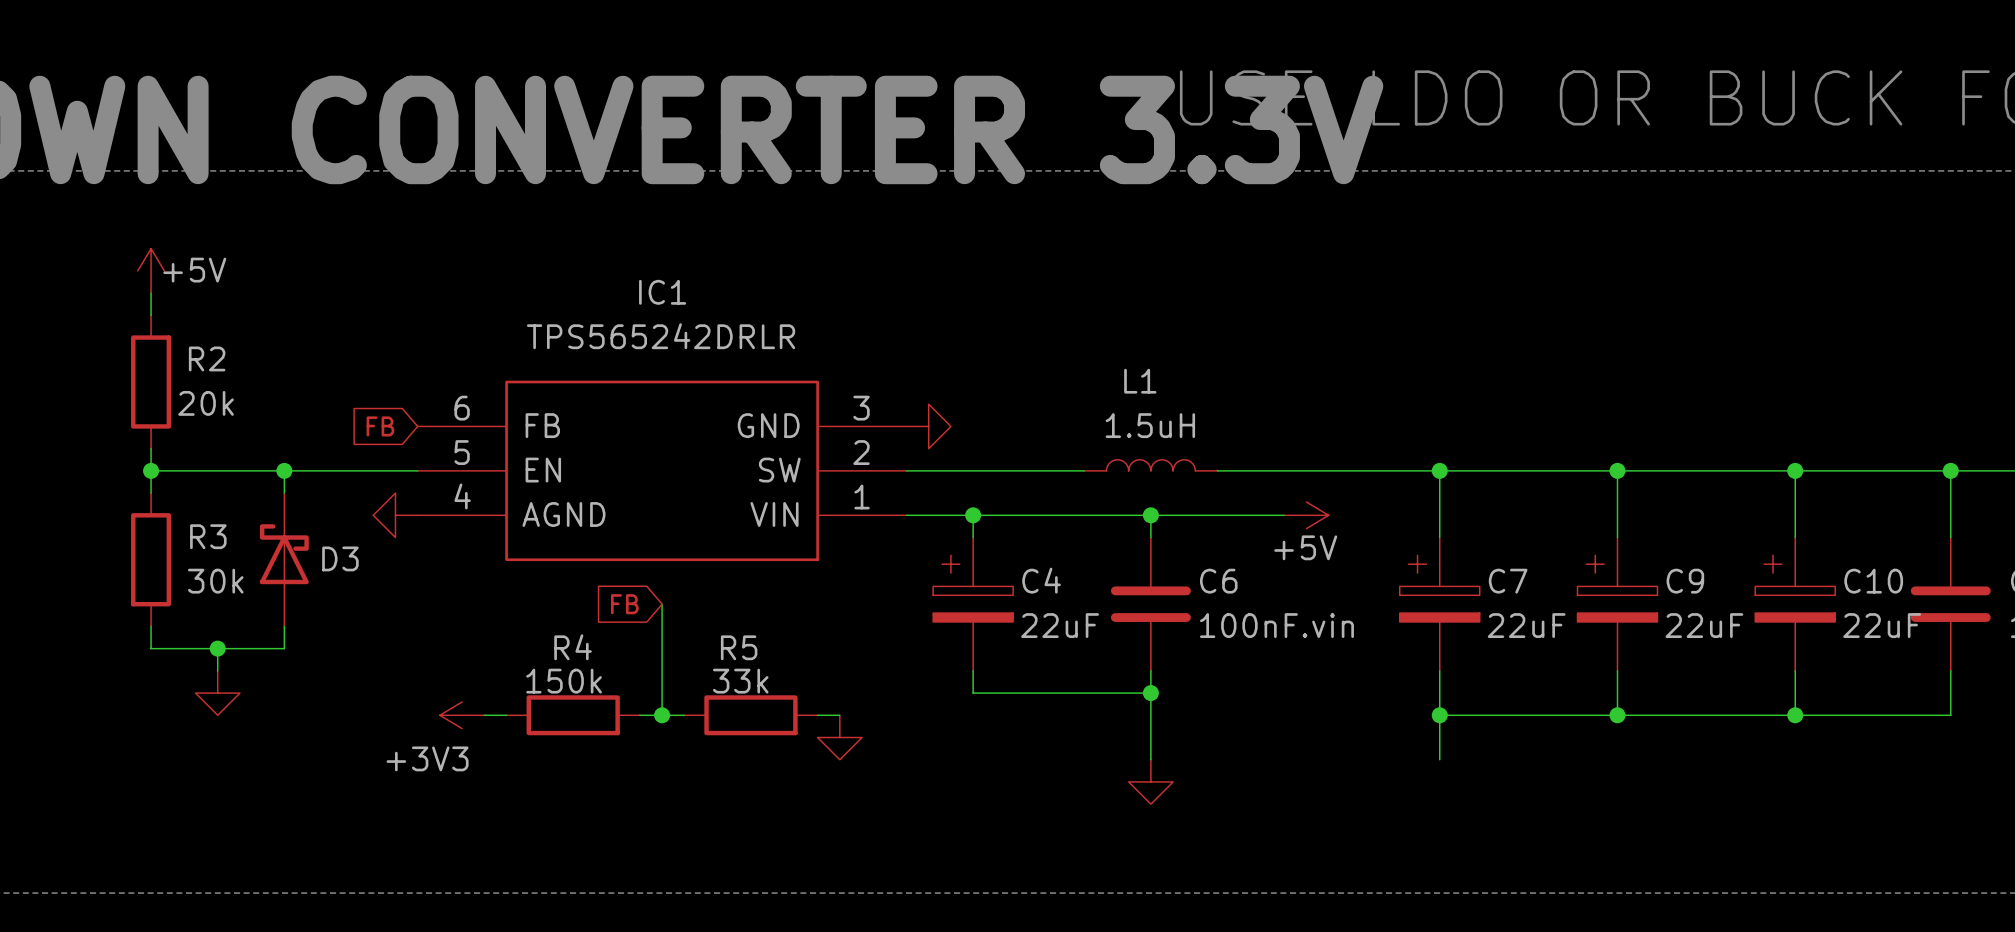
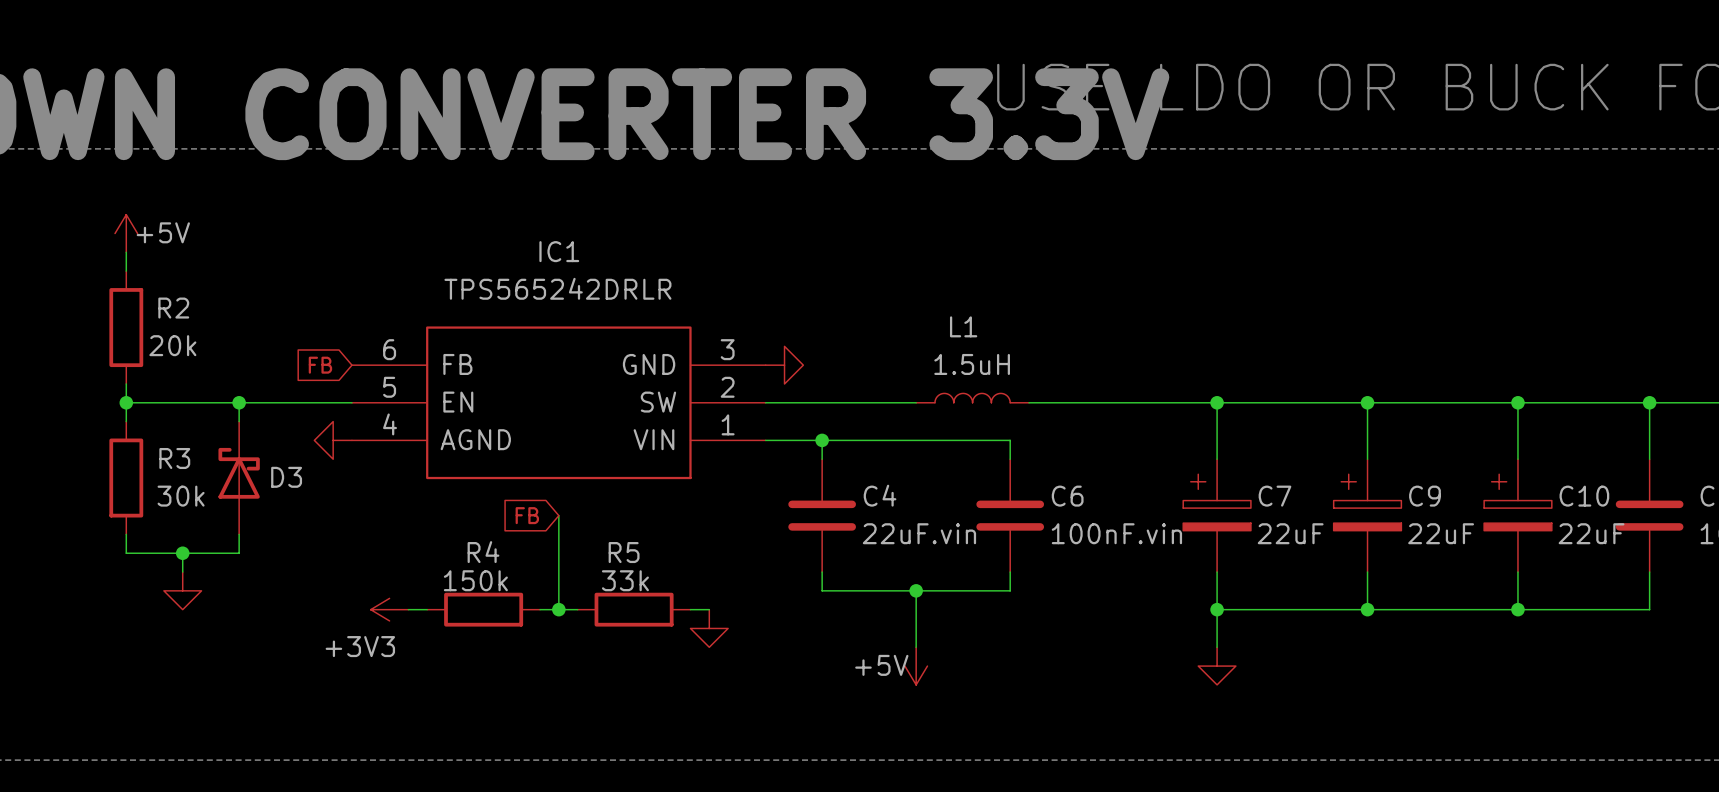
wire: (1150, 515) (1150, 537) -> none
junction: (1150, 515) -> none
wire: (1195, 515) (1284, 515) -> (1010, 440) (1010, 459)
power symbol rotation: 0° (1306, 515) -> 90° clockwise (916, 666)
power symbol position: +5V (1306, 515) -> +5V (916, 666)
C4 symbol: [933, 537, 1014, 671] -> [788, 459, 856, 573]
C6 position: (1150, 604) -> (1010, 515)
C4 value: 22uF (1060, 625) -> 22uF.vin (919, 533)
wire: (1150, 670) (1150, 759) -> none
wire: none -> (1010, 572) (1010, 590) (972, 590)
wire: none -> (916, 590) (916, 647)
junction position: (1150, 693) -> (916, 590)
power symbol position: (1150, 781) -> (1217, 666)

